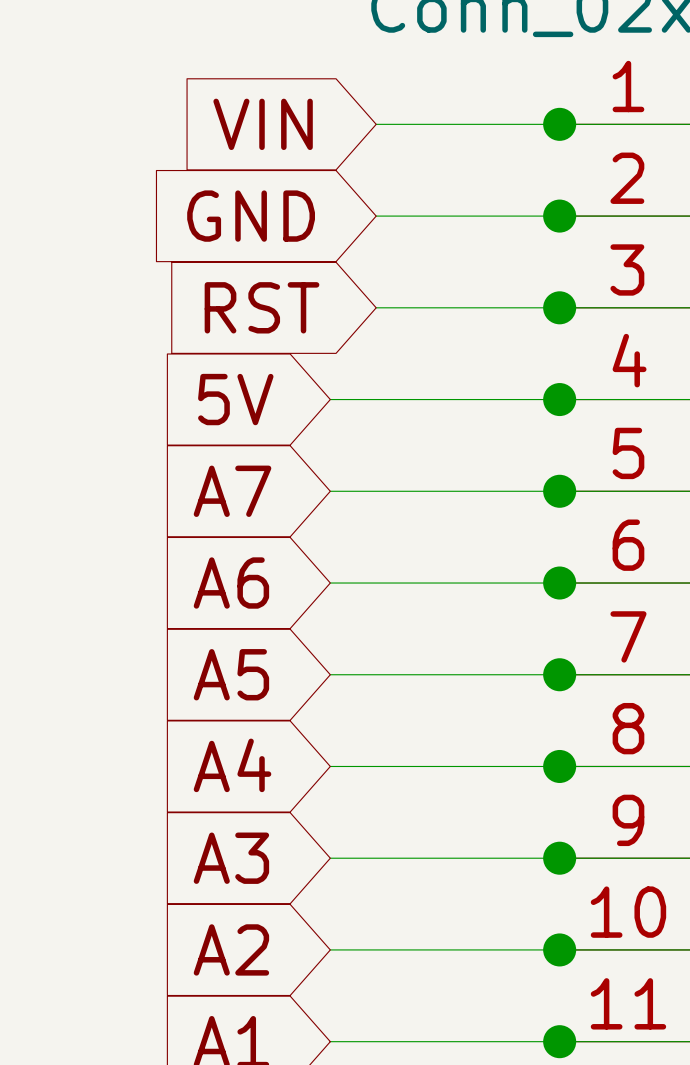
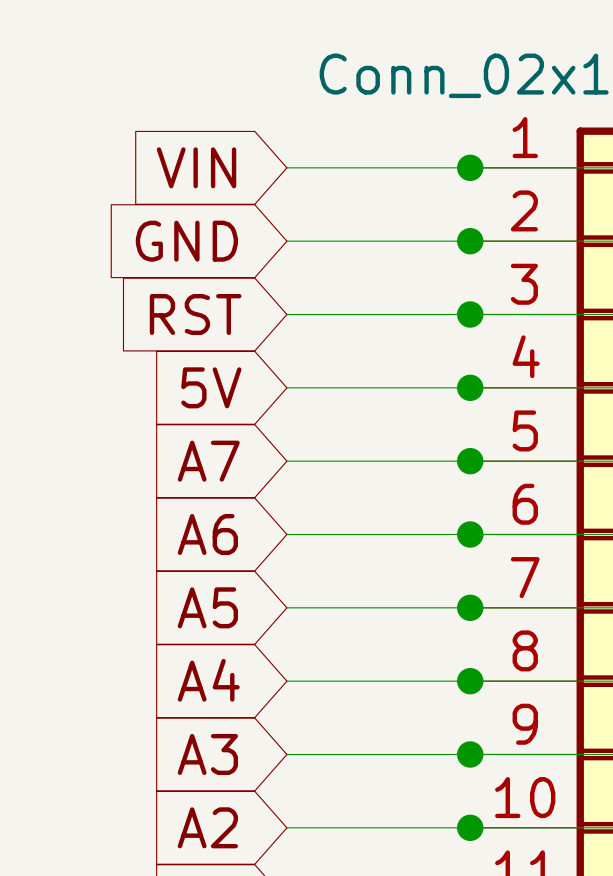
global label position: VIN (263, 124) -> VIN (196, 167)
wire: none -> (286, 167) (323, 167)
global label position: GND (251, 216) -> GND (186, 241)
wire: none -> (286, 241) (323, 241)
global label position: RST (262, 307) -> RST (195, 314)
wire: none -> (286, 314) (323, 314)

